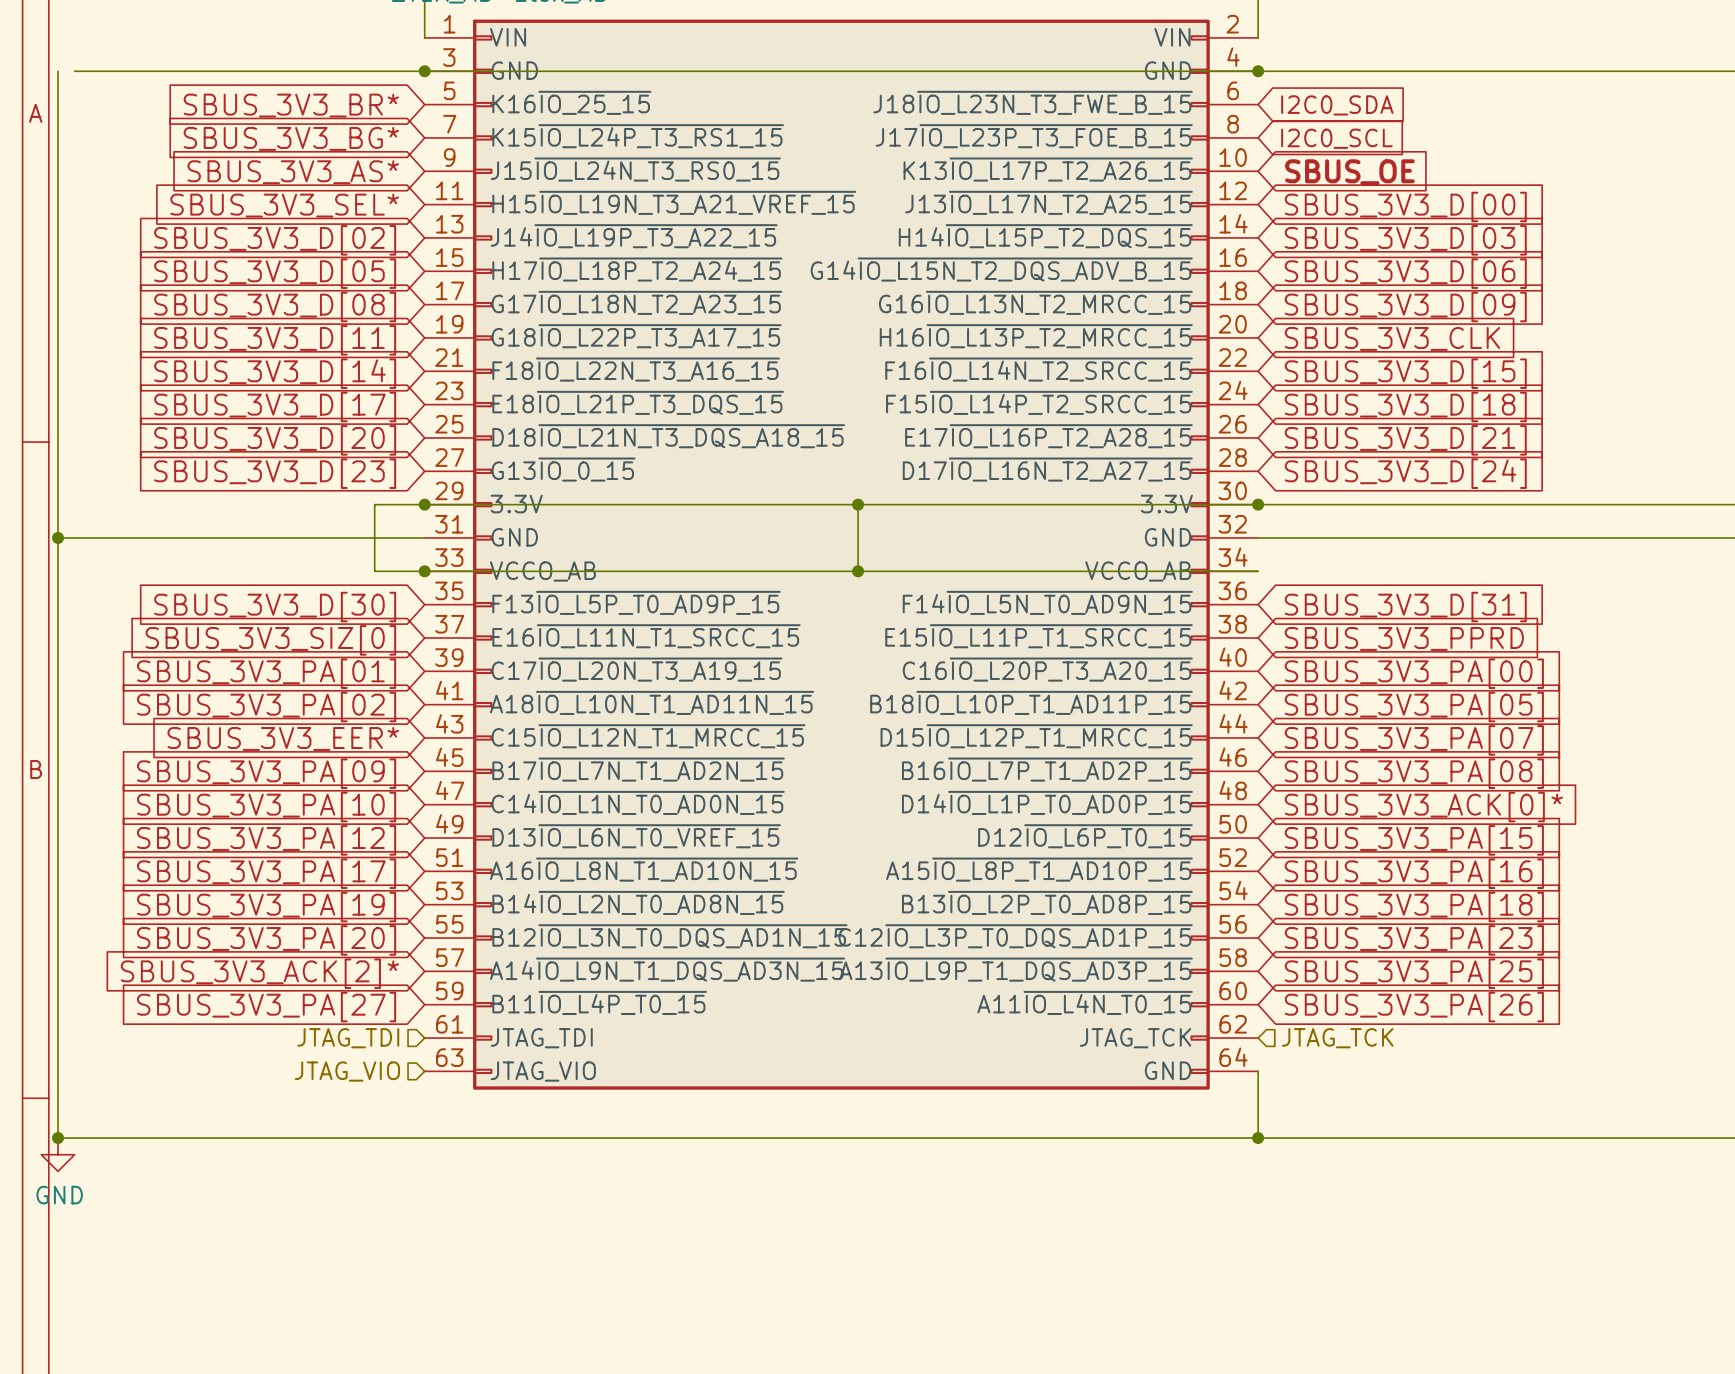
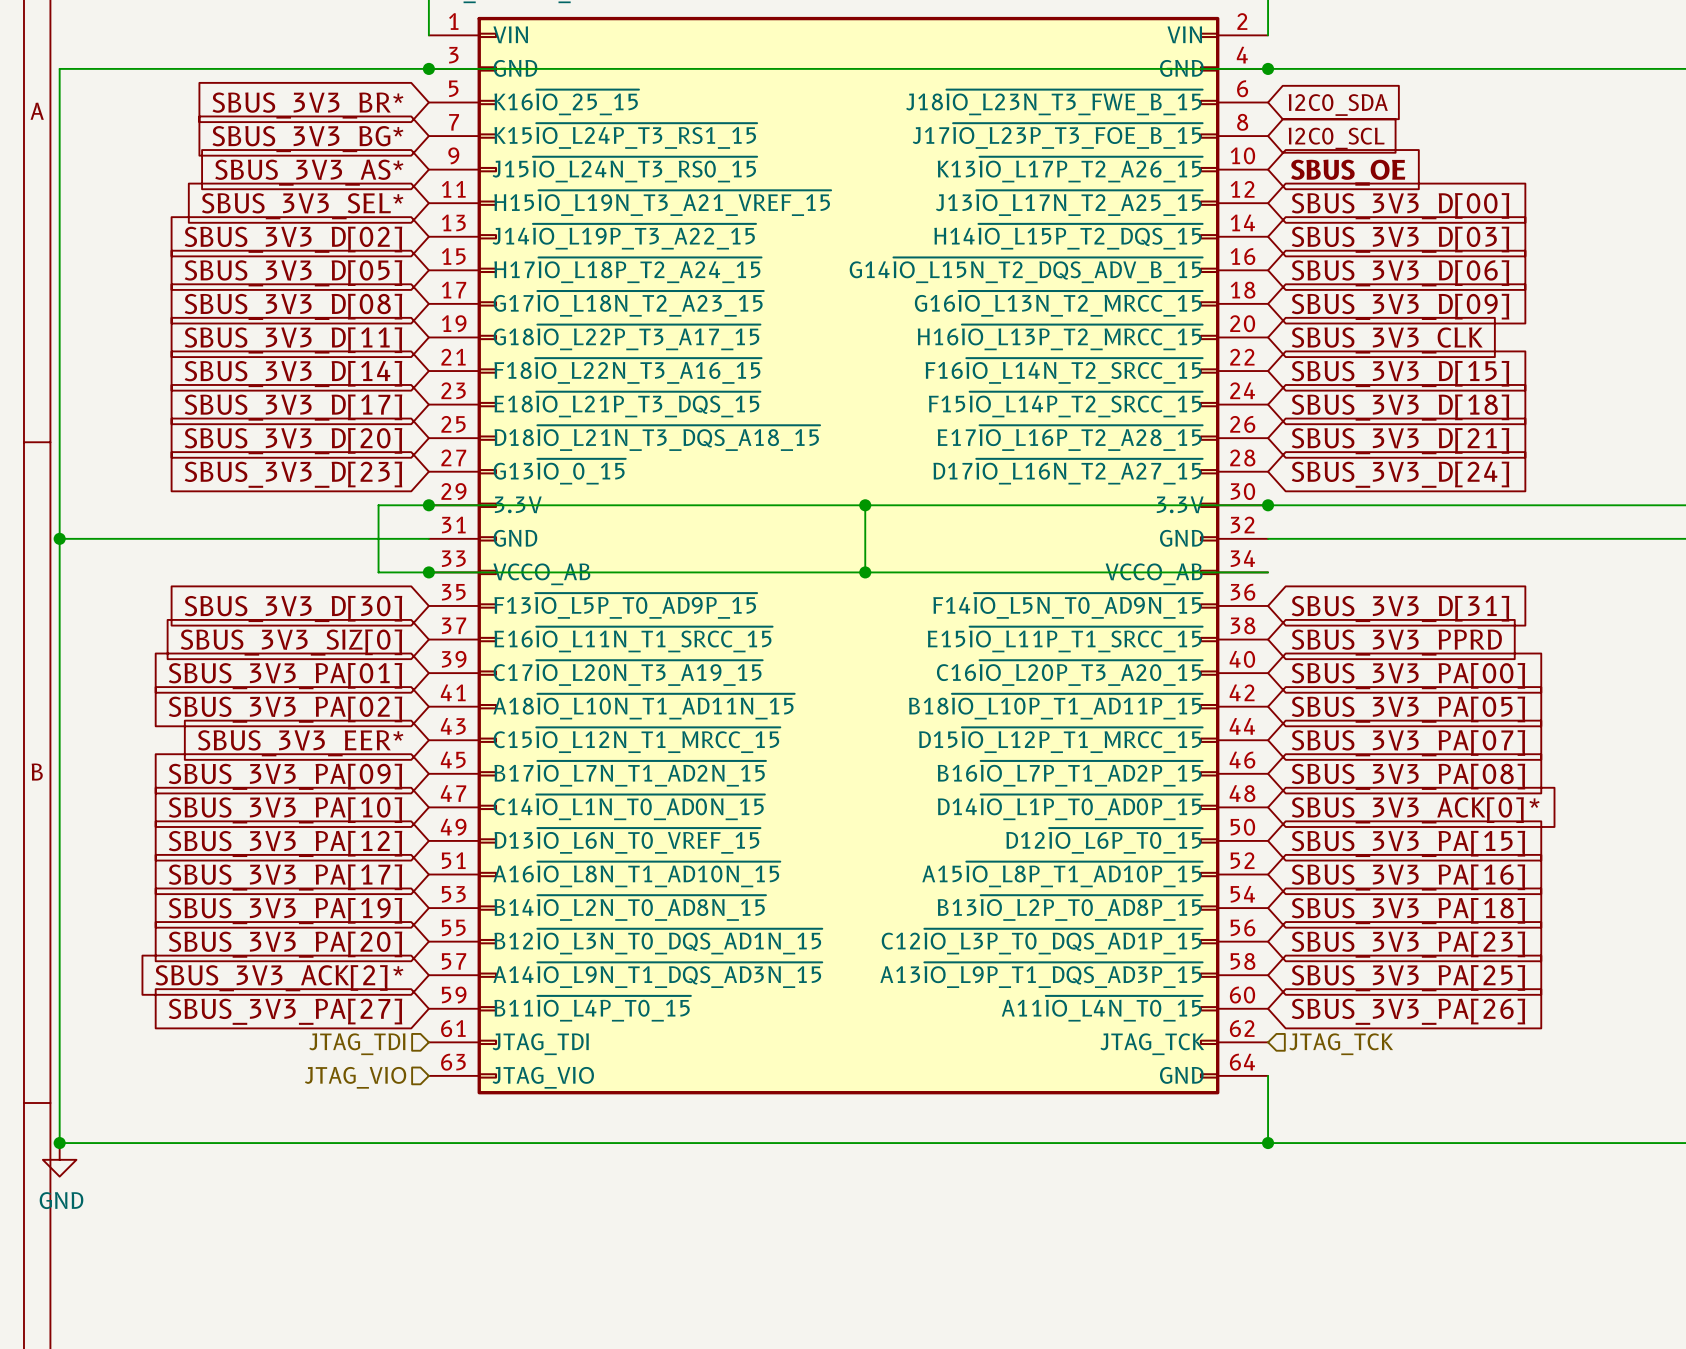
wire: none -> (59, 68) (76, 68)

